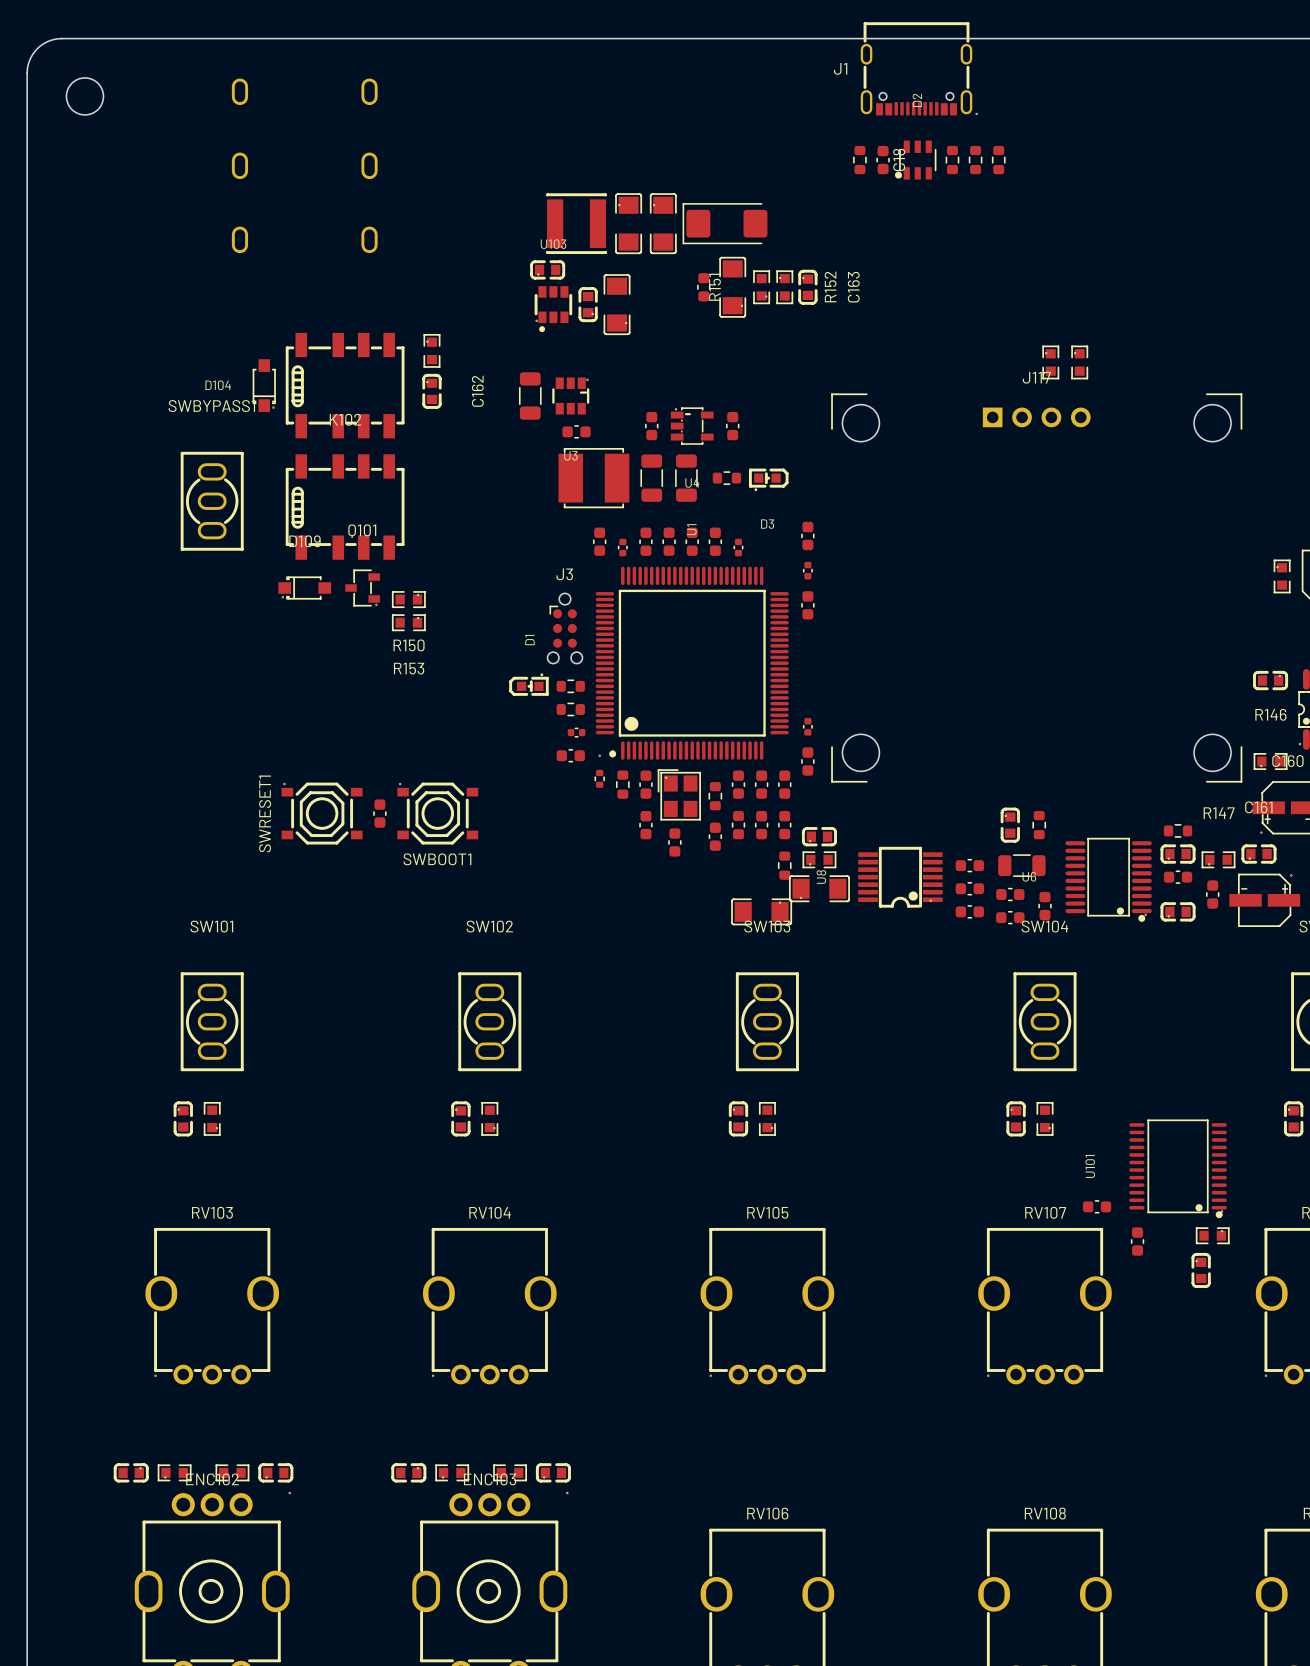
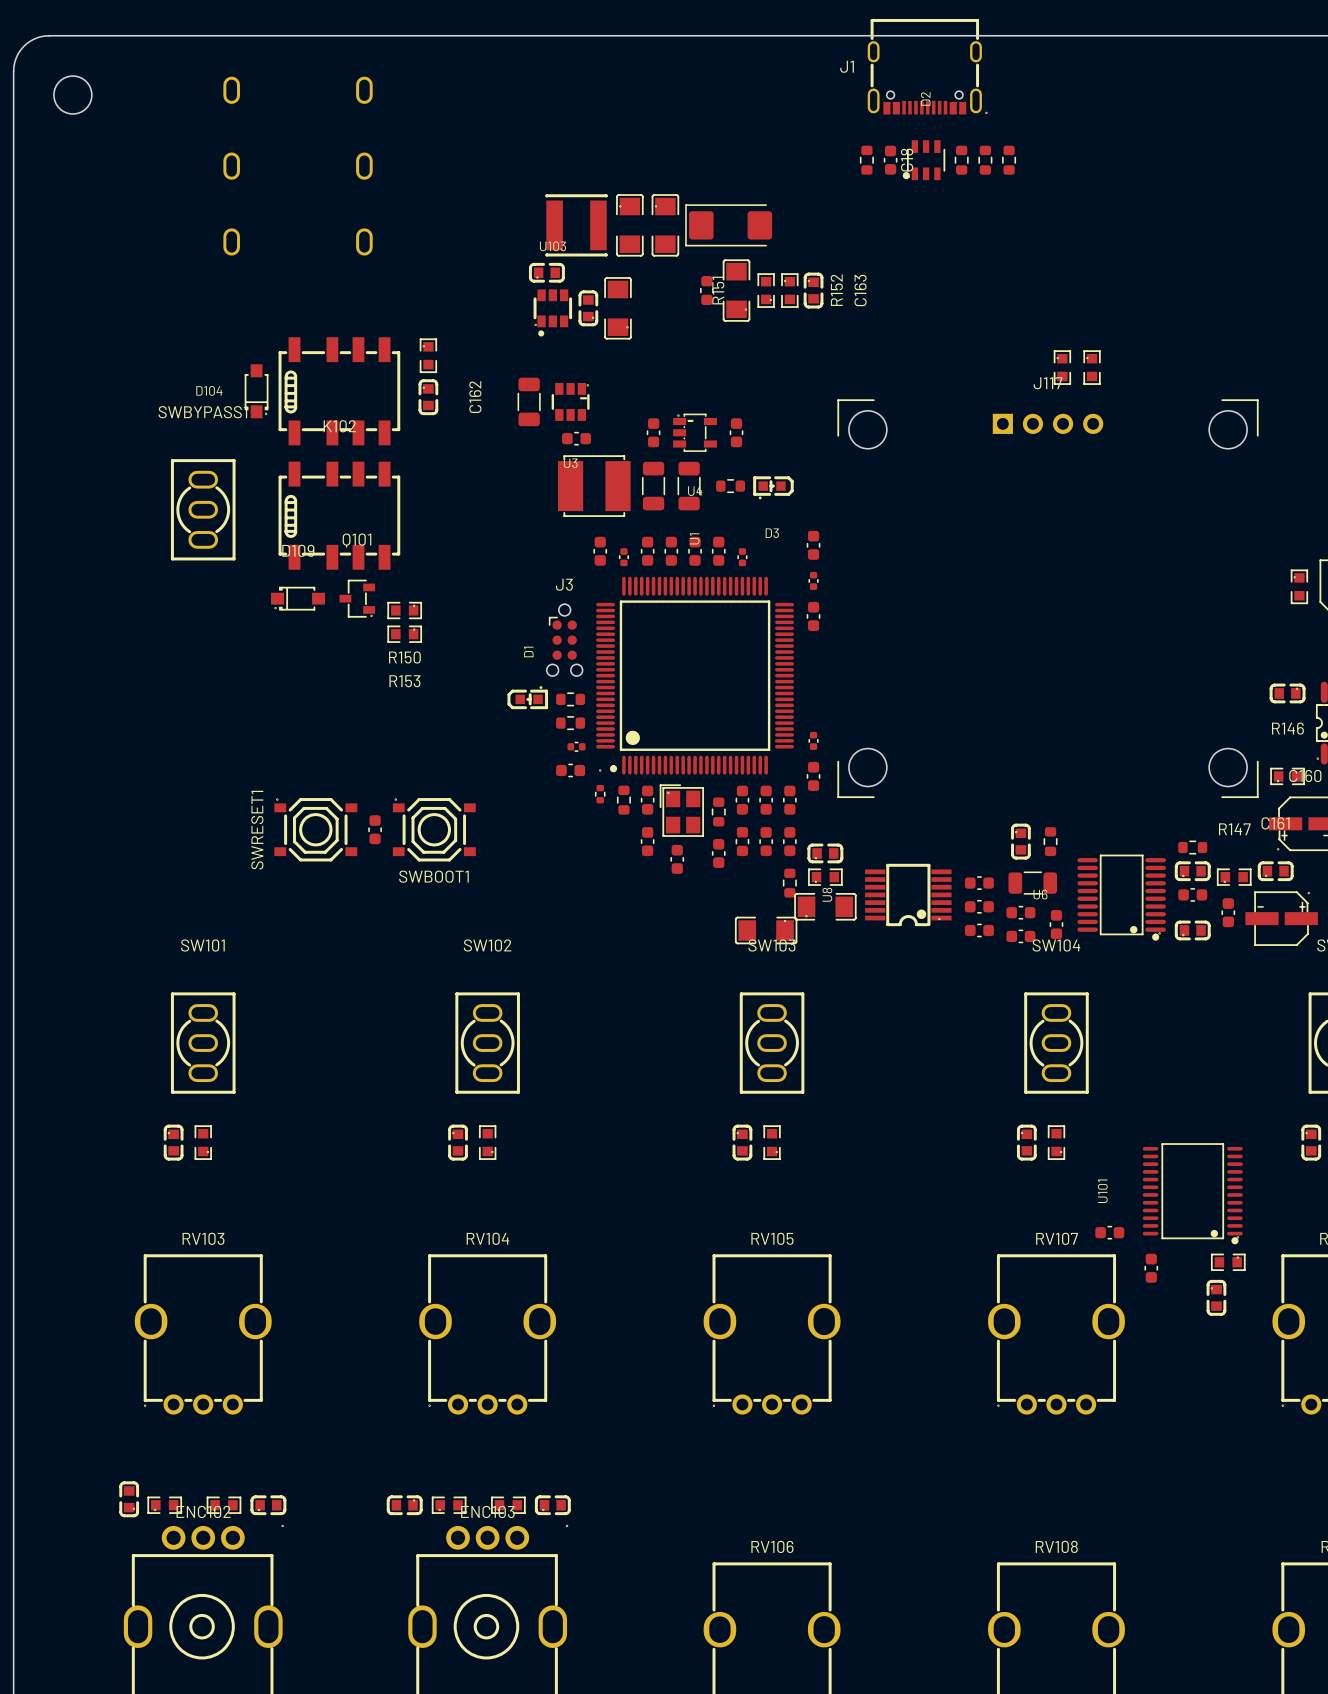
part rotation: 0° (131, 1472) -> 90° clockwise (129, 1499)

